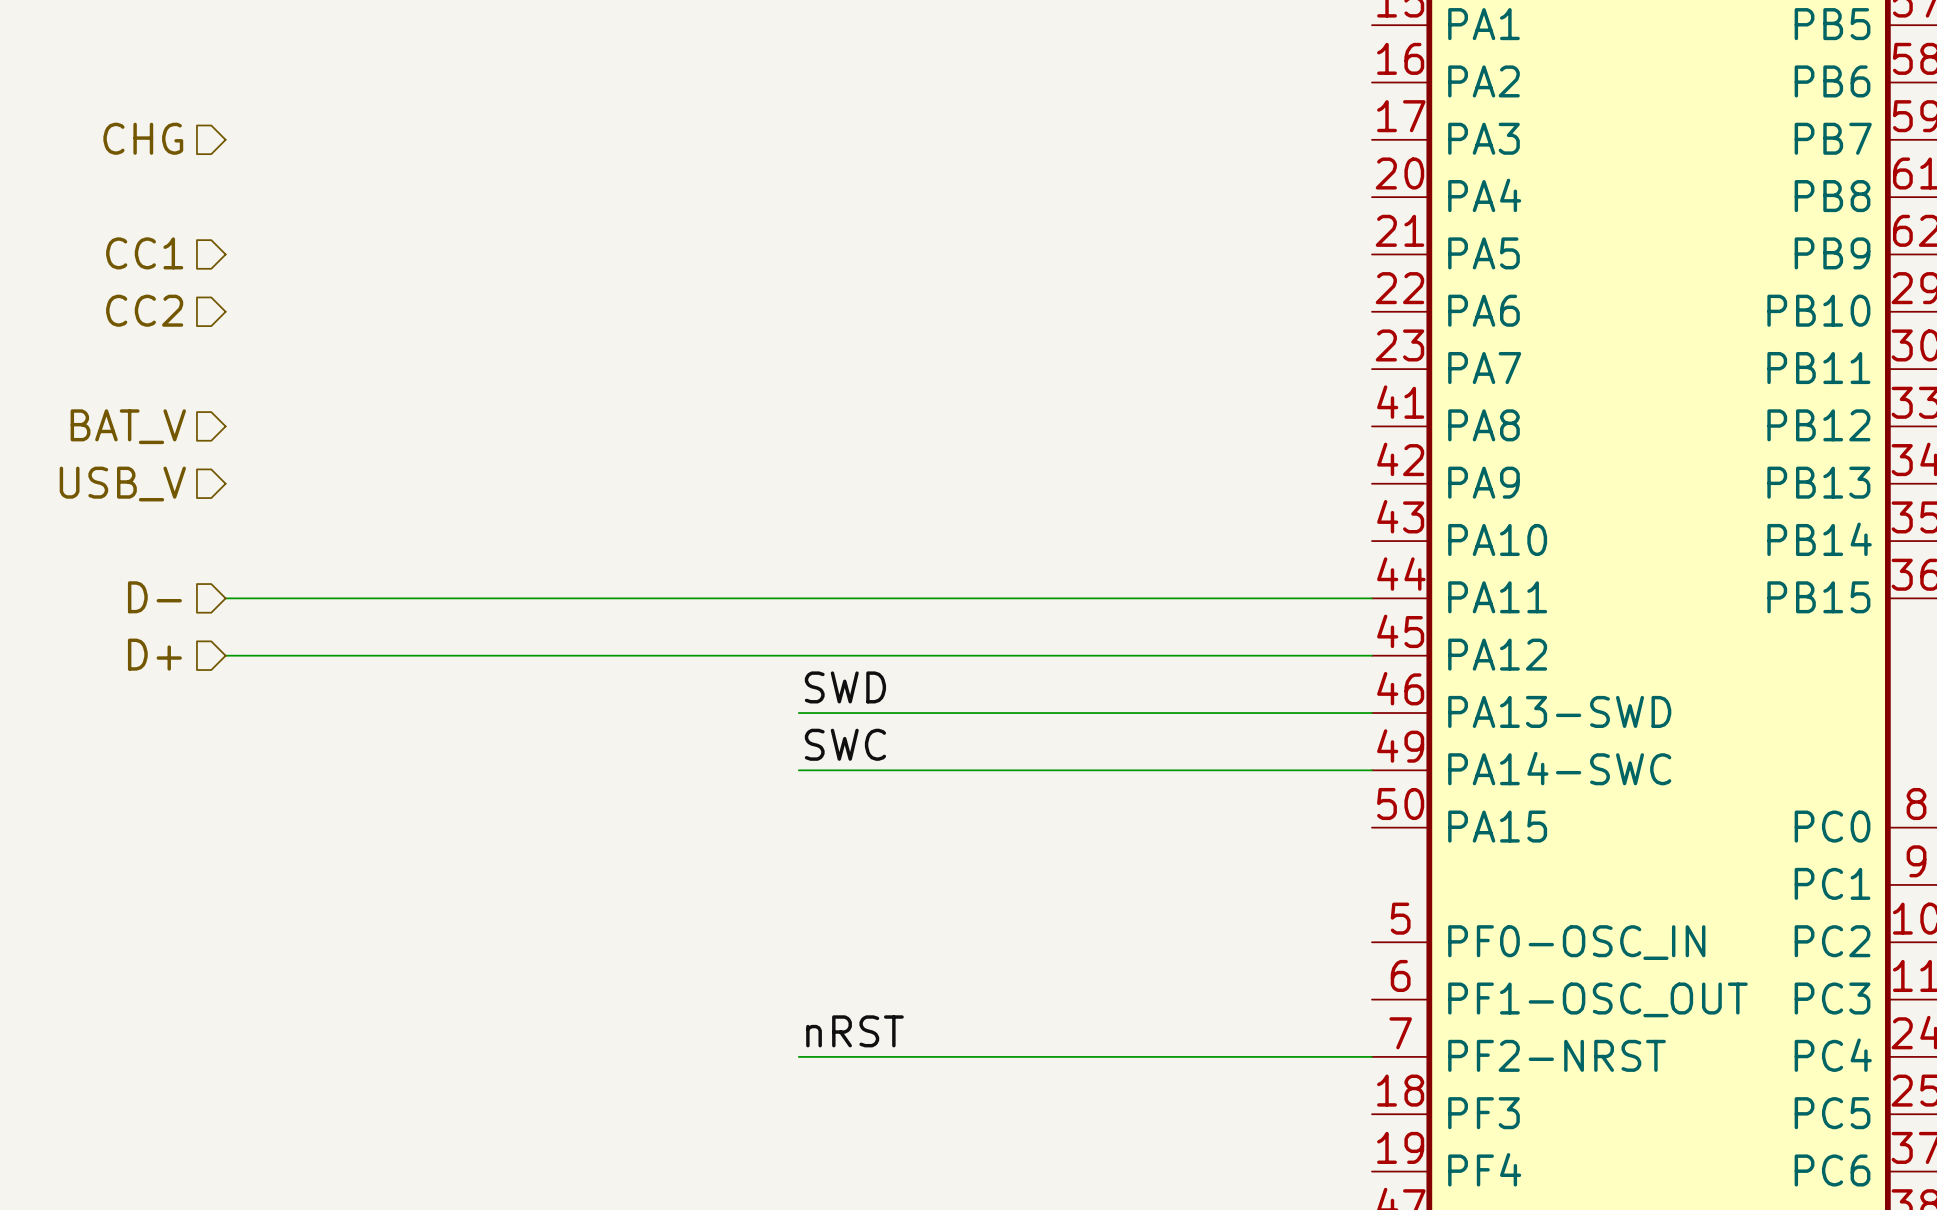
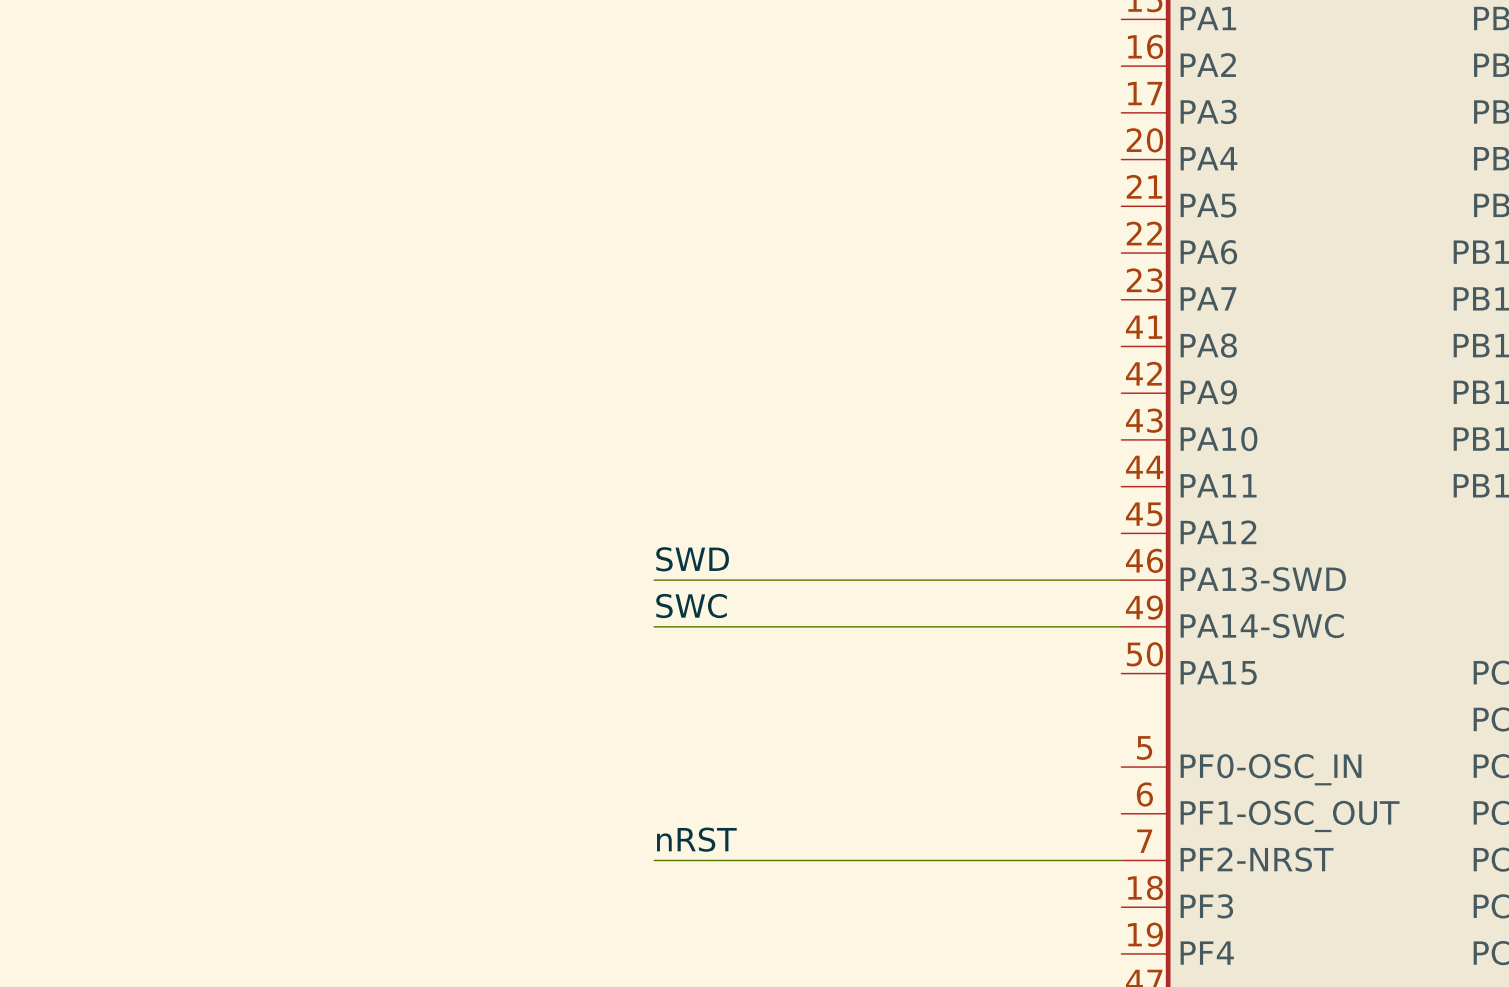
hierarchical label: CHG (143, 138) -> none
hierarchical label: CC1 (144, 253) -> none
hierarchical label: CC2 (144, 310) -> none
hierarchical label: BAT_V (128, 426) -> none
hierarchical label: USB_V (122, 484) -> none
hierarchical label: D- (154, 597) -> none
wire: (225, 598) (1372, 598) -> none
hierarchical label: D+ (154, 654) -> none
wire: (225, 655) (1372, 655) -> none

